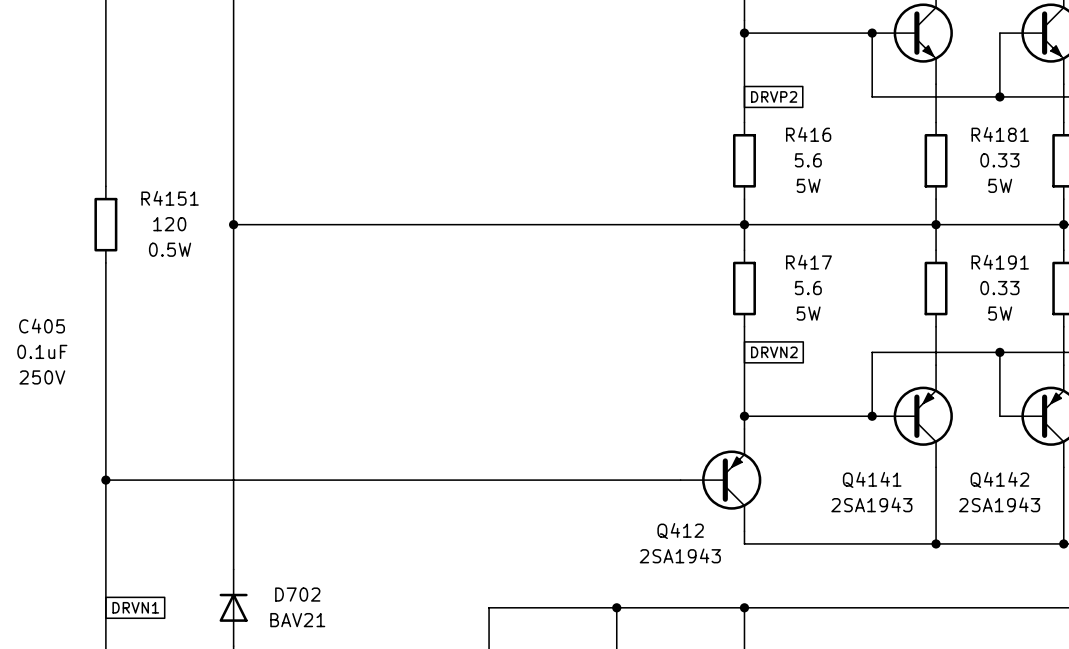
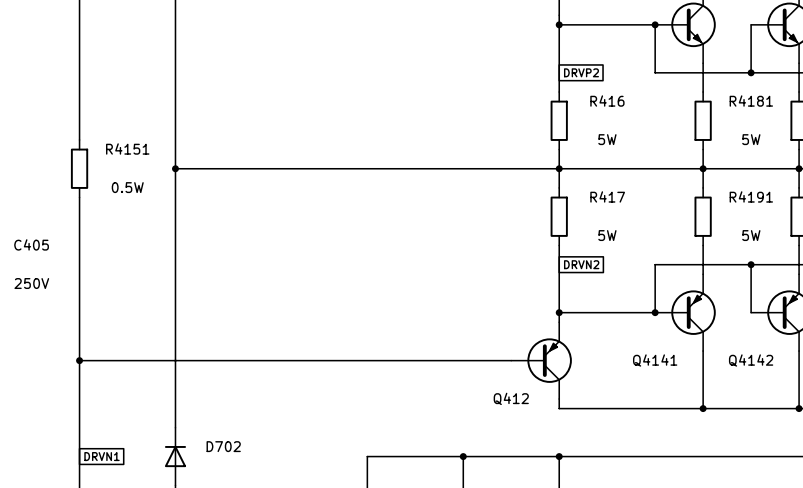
R416 value: 5.6 (808, 160) -> none
R4181 value: 0.33 (999, 160) -> none
R4151 value: 120 (169, 224) -> none
R417 value: 5.6 (808, 288) -> none
R4191 value: 0.33 (999, 288) -> none
C405 value: 0.1uF (42, 351) -> none
Q4141 value: 2SA1943 (871, 504) -> none
Q4142 value: 2SA1943 (999, 504) -> none
Q412 value: 2SA1943 (680, 555) -> none
D702 value: BAV21 (297, 620) -> none

